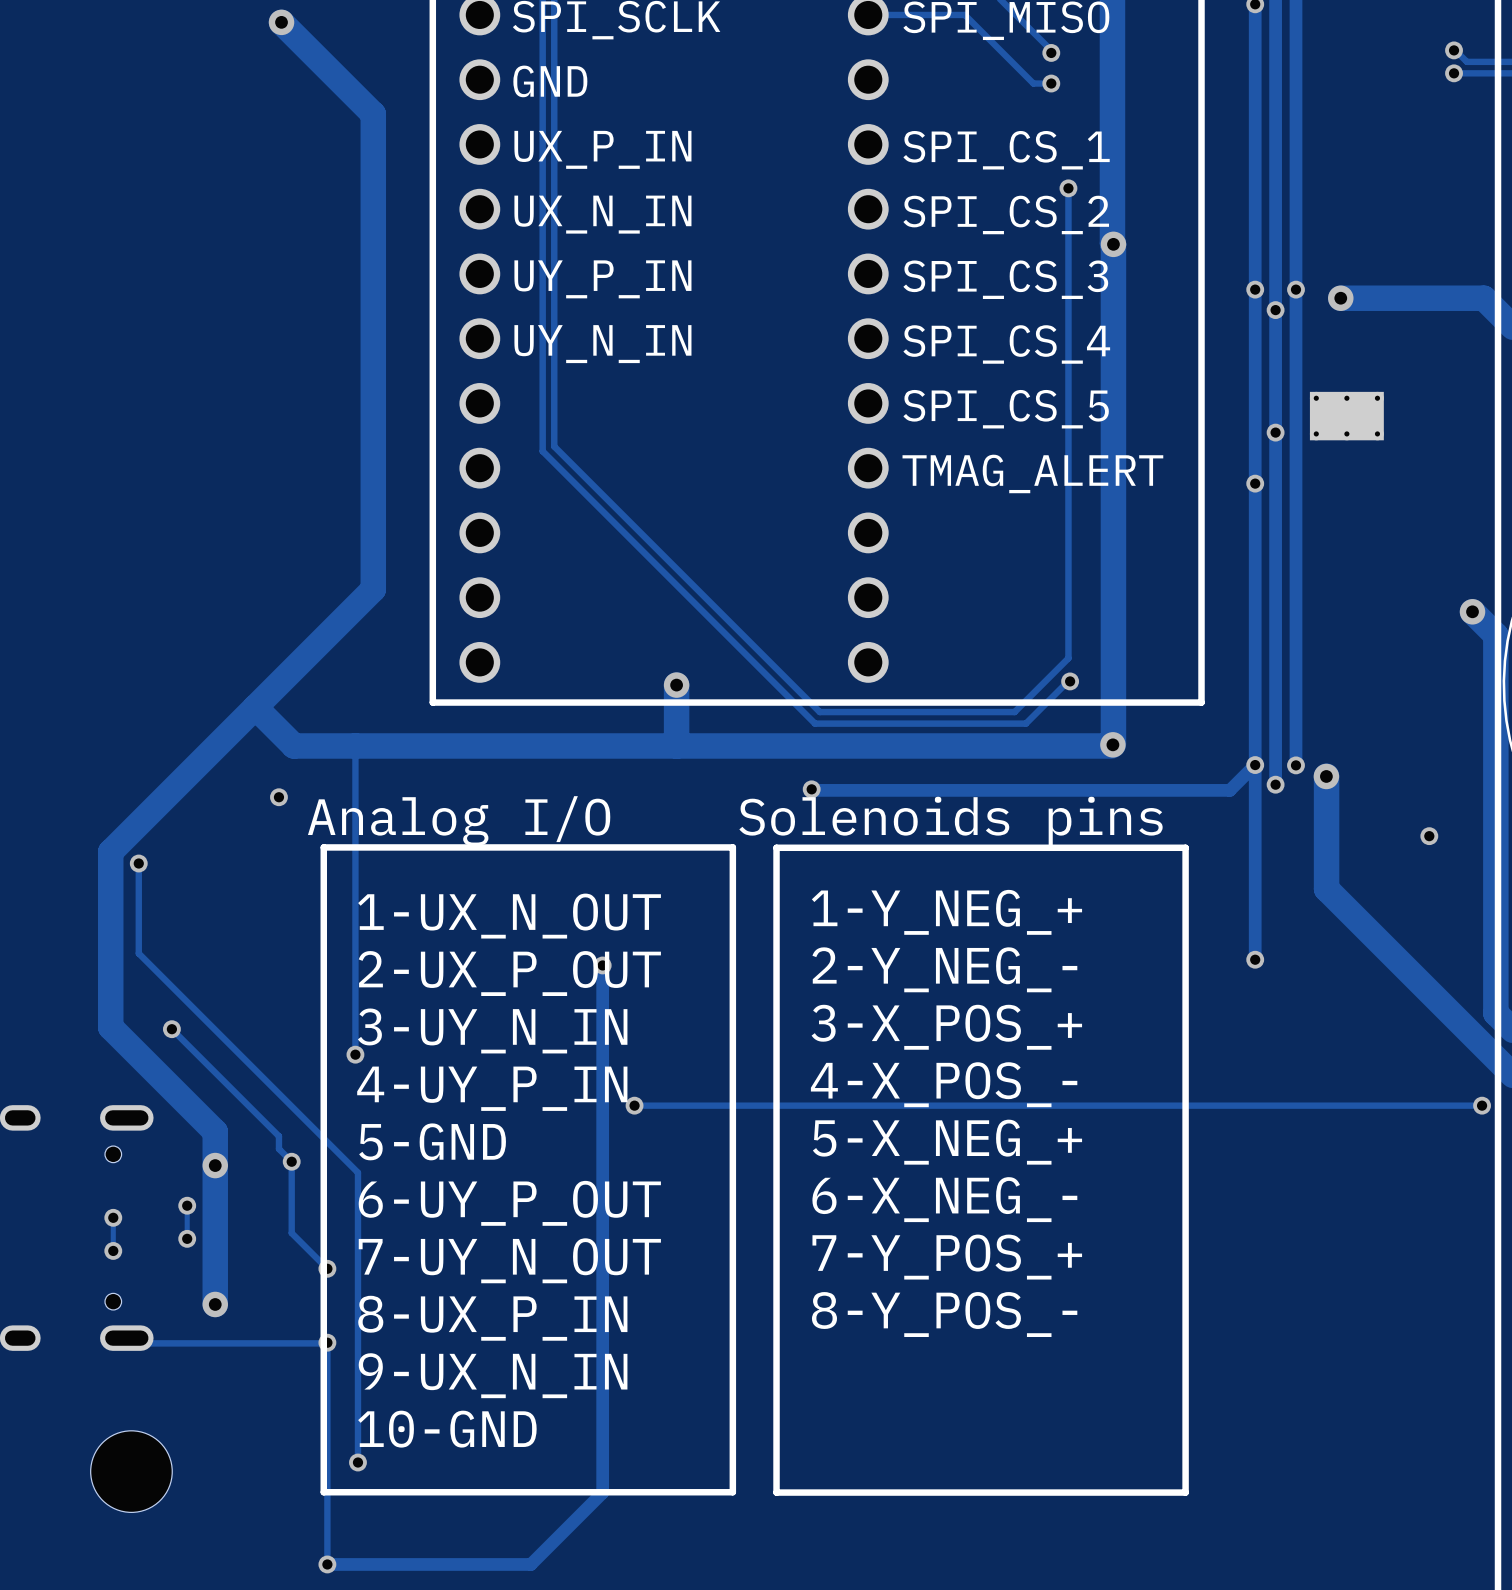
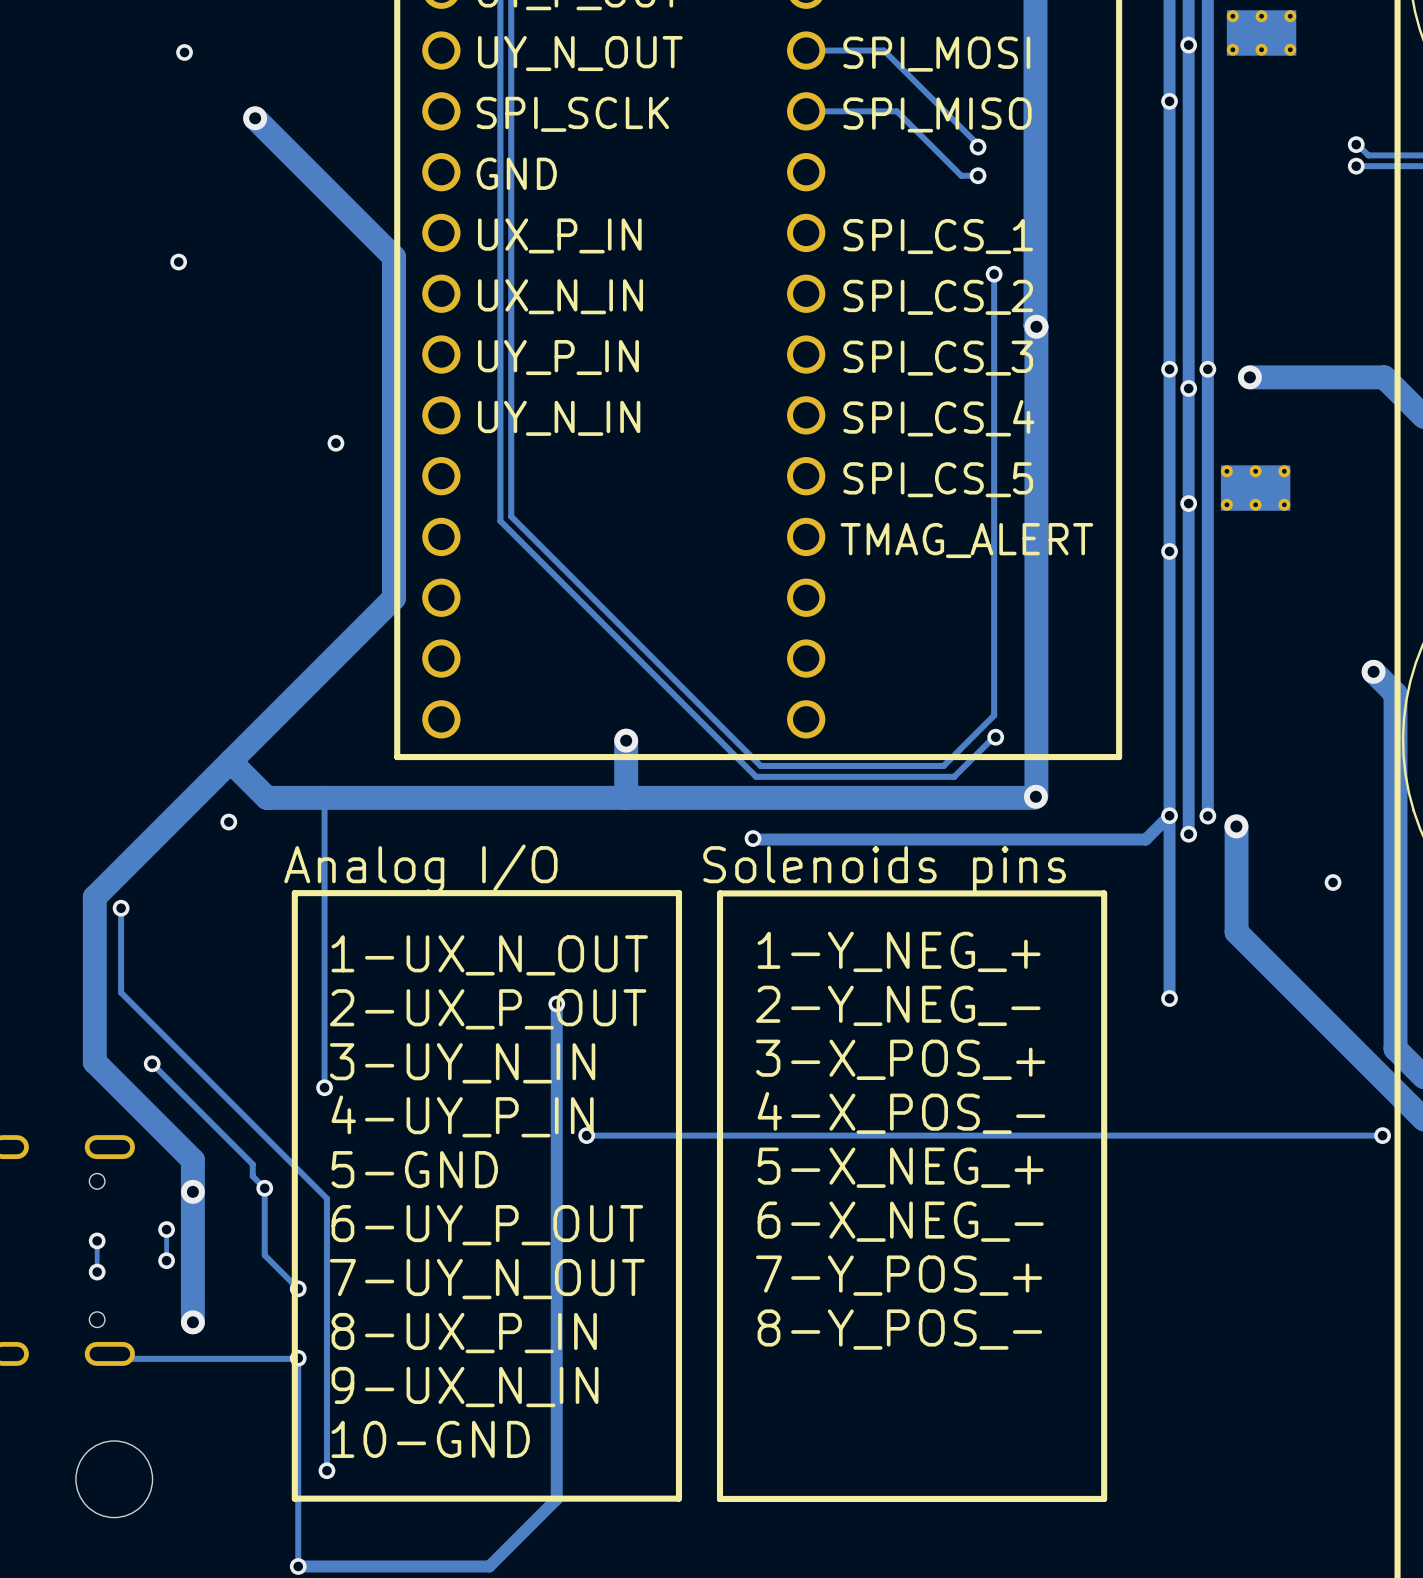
track: (373, 114) (373, 589) -> (341, 204) (393, 257) (393, 598) (341, 650)
via: none -> (178, 262)
via: none -> (335, 443)
via position: (278, 797) -> (228, 822)

